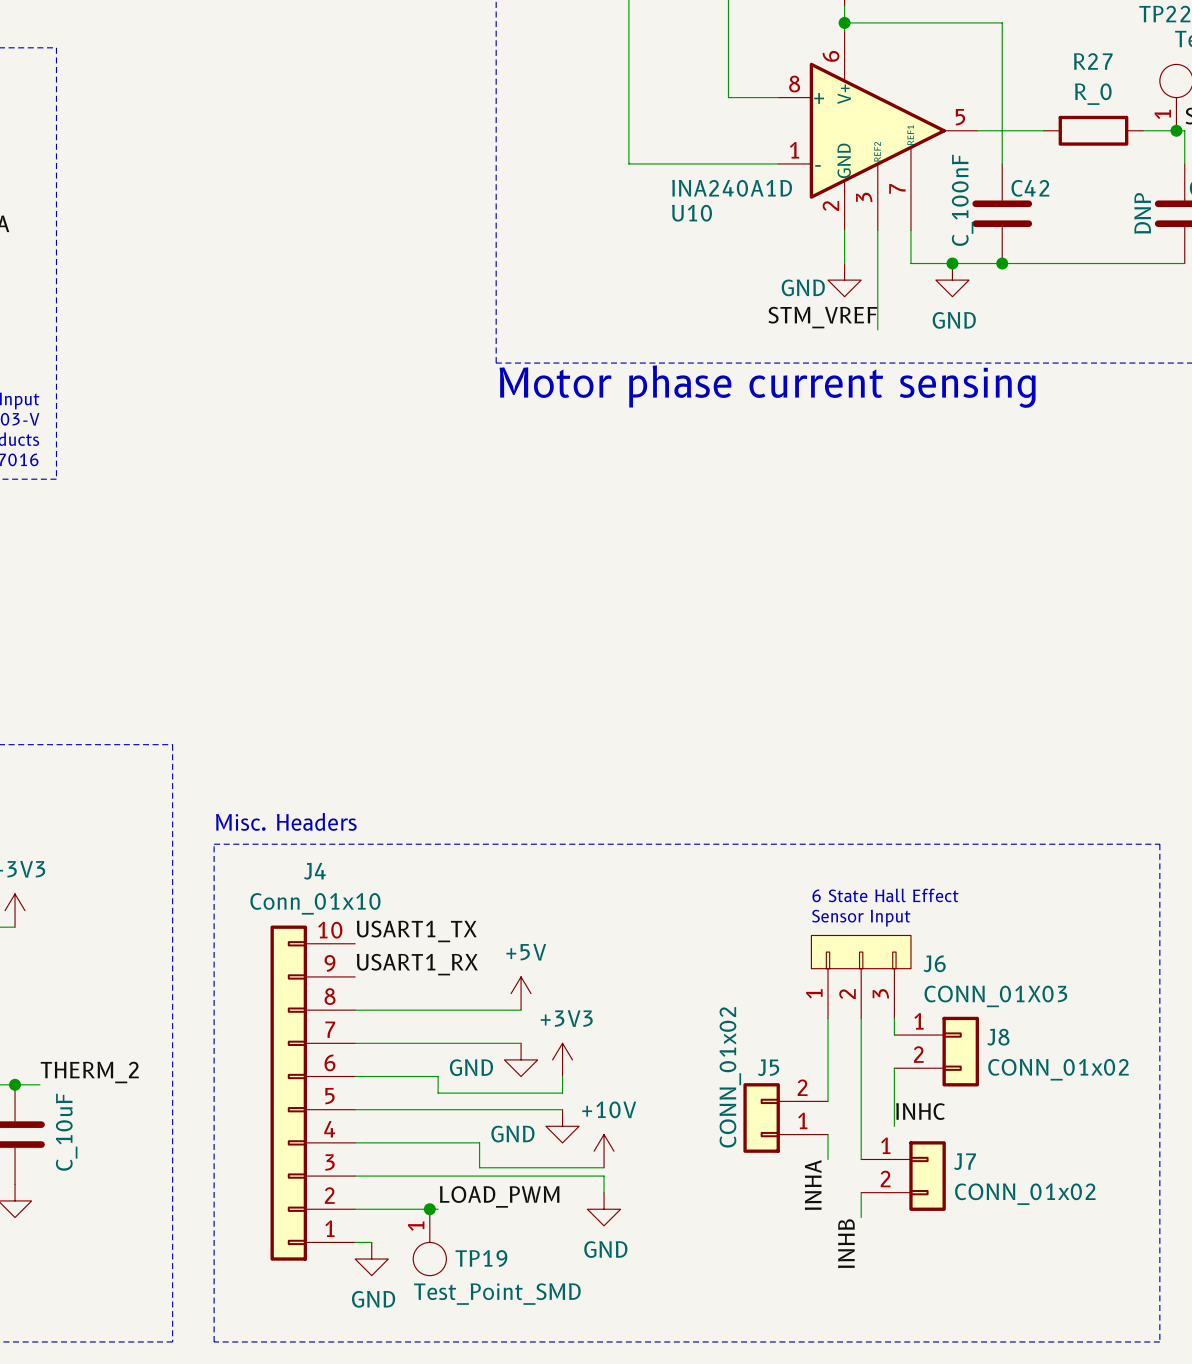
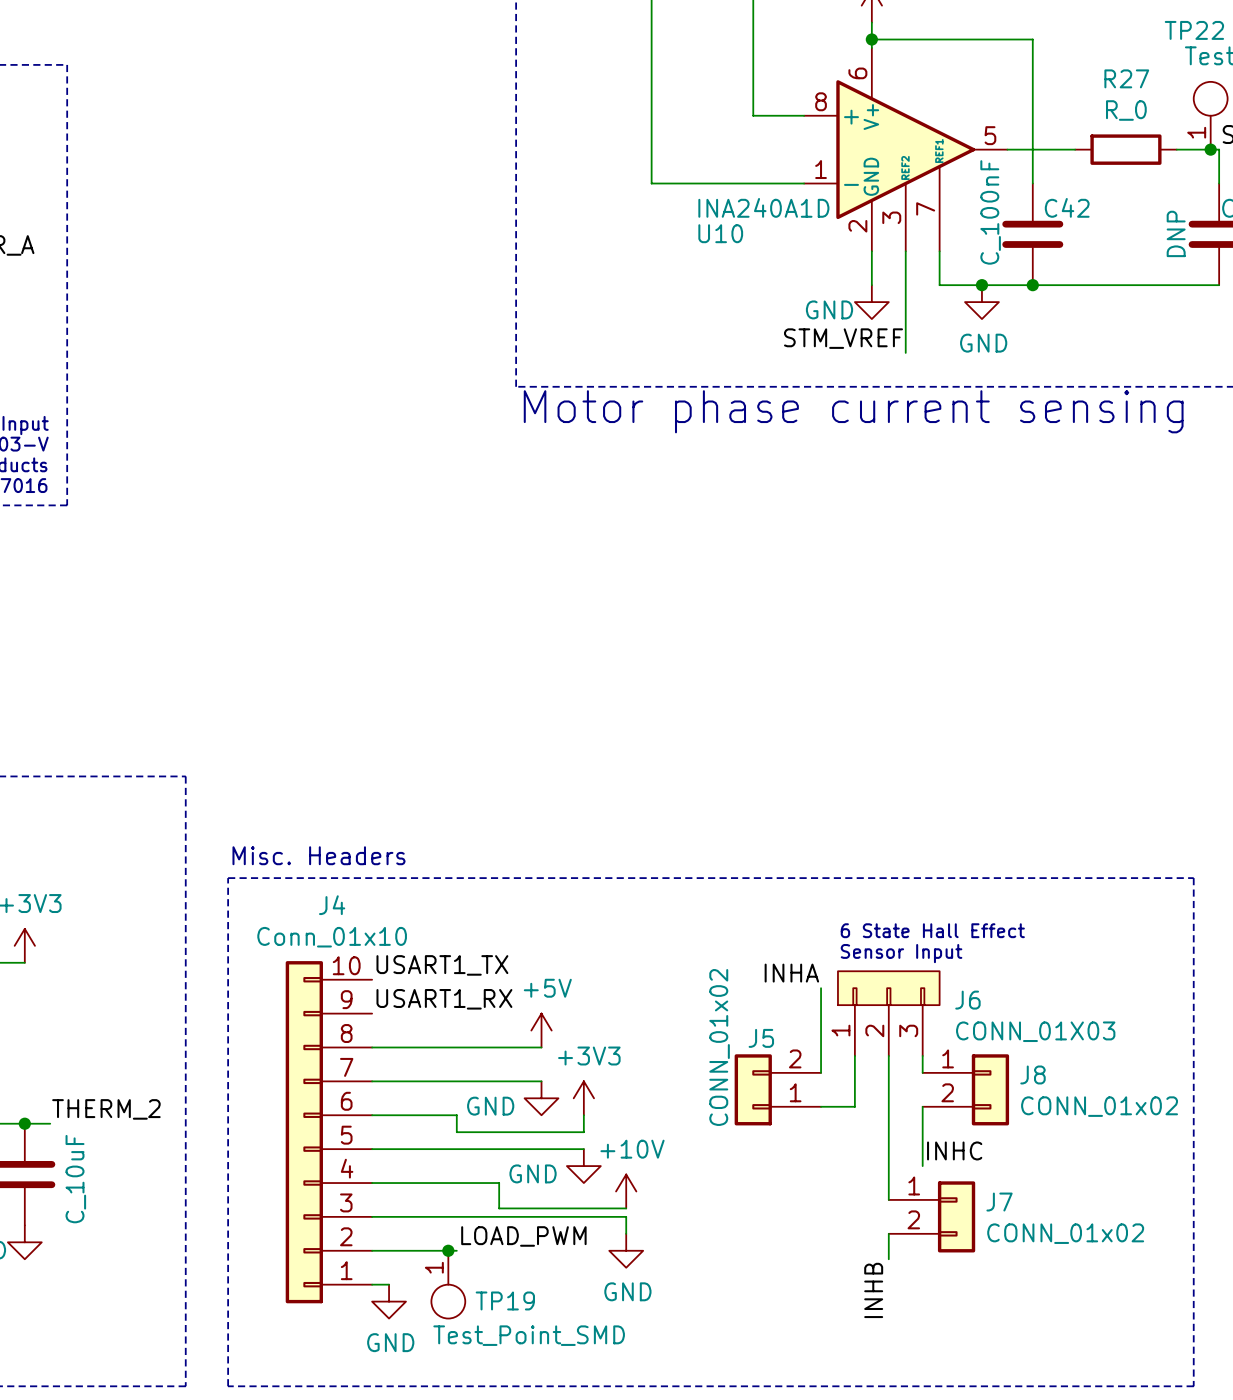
wire: none -> (821, 988) (821, 1072)
wire: (828, 1068) (828, 1101) -> (854, 1106) (821, 1106)
J5 position: (785, 1117) -> (777, 1089)
wire: (828, 1134) (828, 1159) -> none
label rotation: 0° (813, 1185) -> 90° clockwise (791, 973)
label position: INHA (813, 1185) -> INHA (791, 973)

